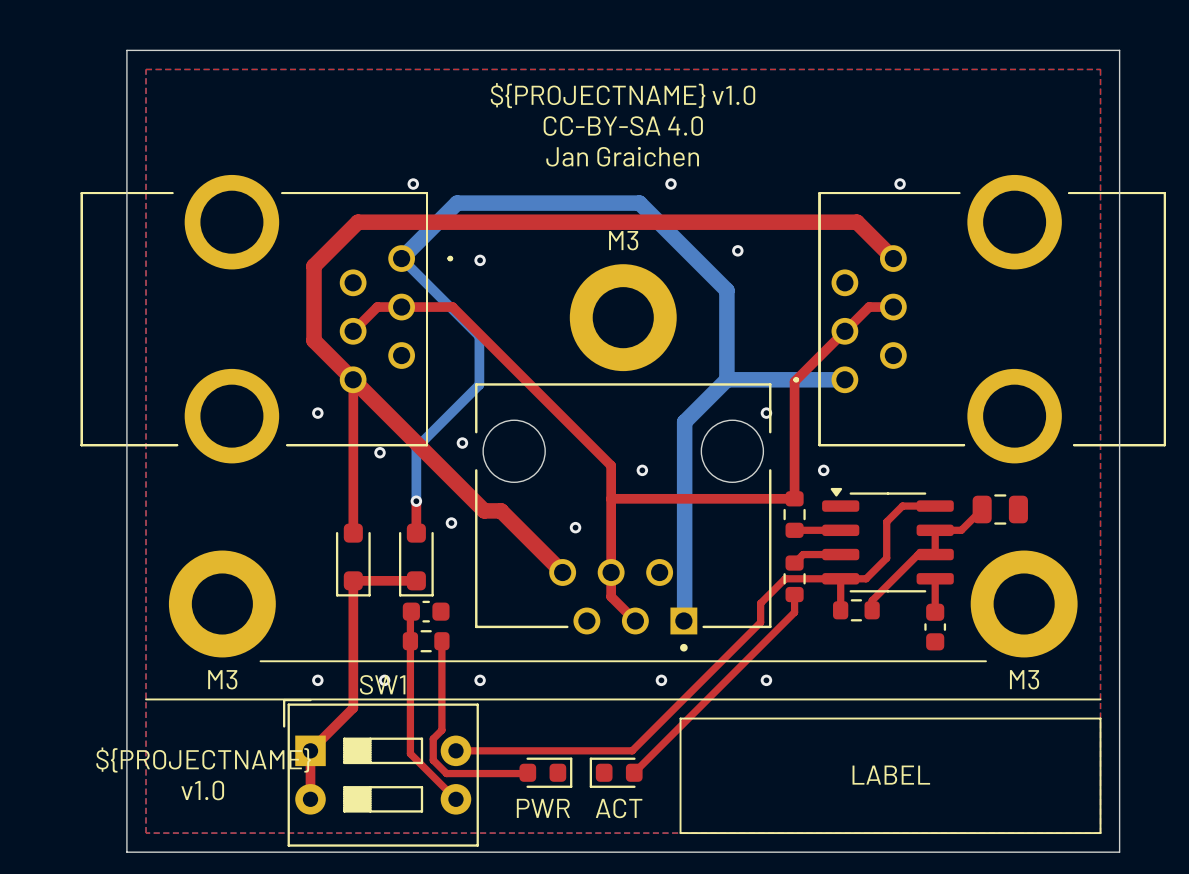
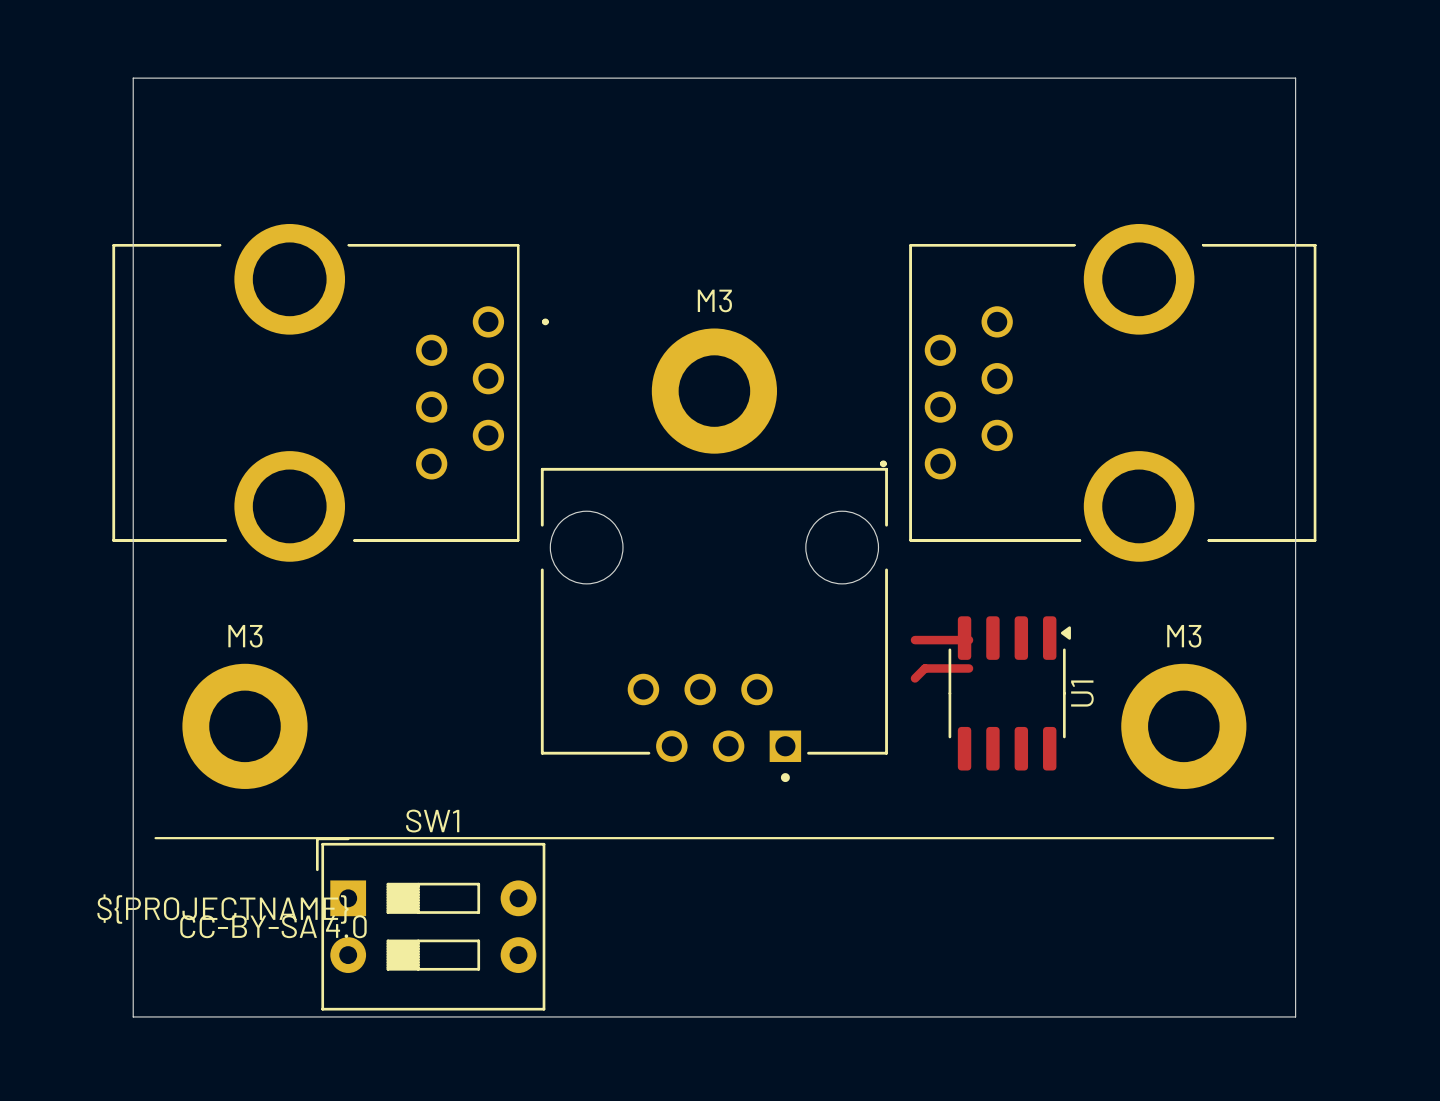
top zone outline: (146, 69) (1100, 69) (1100, 833) (146, 833) (146, 69) -> none
text: ${PROJECTNAME} v1.0 (623, 95) -> none
text: CC-BY-SA 4.0 (623, 126) -> none
text: Jan Graichen (622, 156) -> none
via: (413, 184) -> none
via: (670, 184) -> none
via: (900, 184) -> none
via: (737, 250) -> none
top track: (893, 258) (857, 222) (357, 222) (314, 266) (314, 340) (484, 510) (501, 510) (562, 572) -> none
via: (480, 260) -> none
top track: (401, 307) (377, 307) (353, 331) -> none
top track: (406, 307) (452, 307) (611, 465) (611, 596) (635, 620) -> none
top track: (893, 307) (869, 307) (794, 381) (794, 498) (611, 498) -> none
part position: (266, 319) -> (330, 392)
part position: (979, 319) -> (1098, 392)
top track: (353, 379) (353, 533) -> none
bottom track: (726, 379) (726, 290) (639, 203) (457, 203) (401, 258) (479, 336) (479, 384) (416, 447) (416, 501) -> none
bottom track: (726, 379) (844, 379) -> none
bottom track: (726, 379) (684, 422) (683, 620) -> none
via: (317, 413) -> none
via: (766, 413) -> none
via: (462, 443) -> none
via: (380, 452) -> none
via: (642, 470) -> none
via: (823, 470) -> none
top track: (416, 501) (416, 533) -> none
via: (416, 501) -> none
top track: (935, 506) (902, 506) (886, 521) (886, 558) (866, 578) (785, 578) (760, 603) (760, 622) (632, 750) (455, 750) -> none
top track: (982, 509) (961, 530) (935, 530) (935, 554) (918, 554) (872, 600) (872, 610) -> none
part: (1000, 509) -> none
part: (794, 514) -> none
via: (451, 523) -> none
via: (575, 527) -> none
part: (887, 540) -> none
part: (353, 560) -> none
part: (416, 560) -> none
U1: none -> (1009, 693)
part: (794, 578) -> none
top track: (840, 578) (840, 610) -> none
top track: (935, 578) (935, 612) -> none
top track: (416, 580) (353, 580) (353, 708) (310, 750) (310, 799) -> none
top track: (794, 594) (794, 612) (634, 772) -> none
part: (856, 610) -> none
part: (426, 611) -> none
top track: (410, 612) (410, 753) (455, 799) -> none
part: (935, 627) -> none
part: (426, 641) -> none
top track: (441, 641) (441, 730) (433, 738) (433, 760) (446, 773) (527, 772) -> none
line: (260, 661) (985, 661) -> none
text position: M3 (222, 679) -> M3 (245, 636)
text position: M3 (1024, 679) -> M3 (1184, 636)
via: (317, 680) -> none
via: (384, 680) -> none
via: (480, 680) -> none
via: (661, 680) -> none
via: (766, 680) -> none
line: (680, 718) (1100, 718) (1100, 833) (680, 833) (680, 718) -> none
part: PWR (545, 772) -> none
part: ACT (616, 772) -> none
text: none -> CC-BY-SA 4.0 (273, 926)
text: LABEL (891, 775) -> none
text: v1.0 (202, 790) -> none

